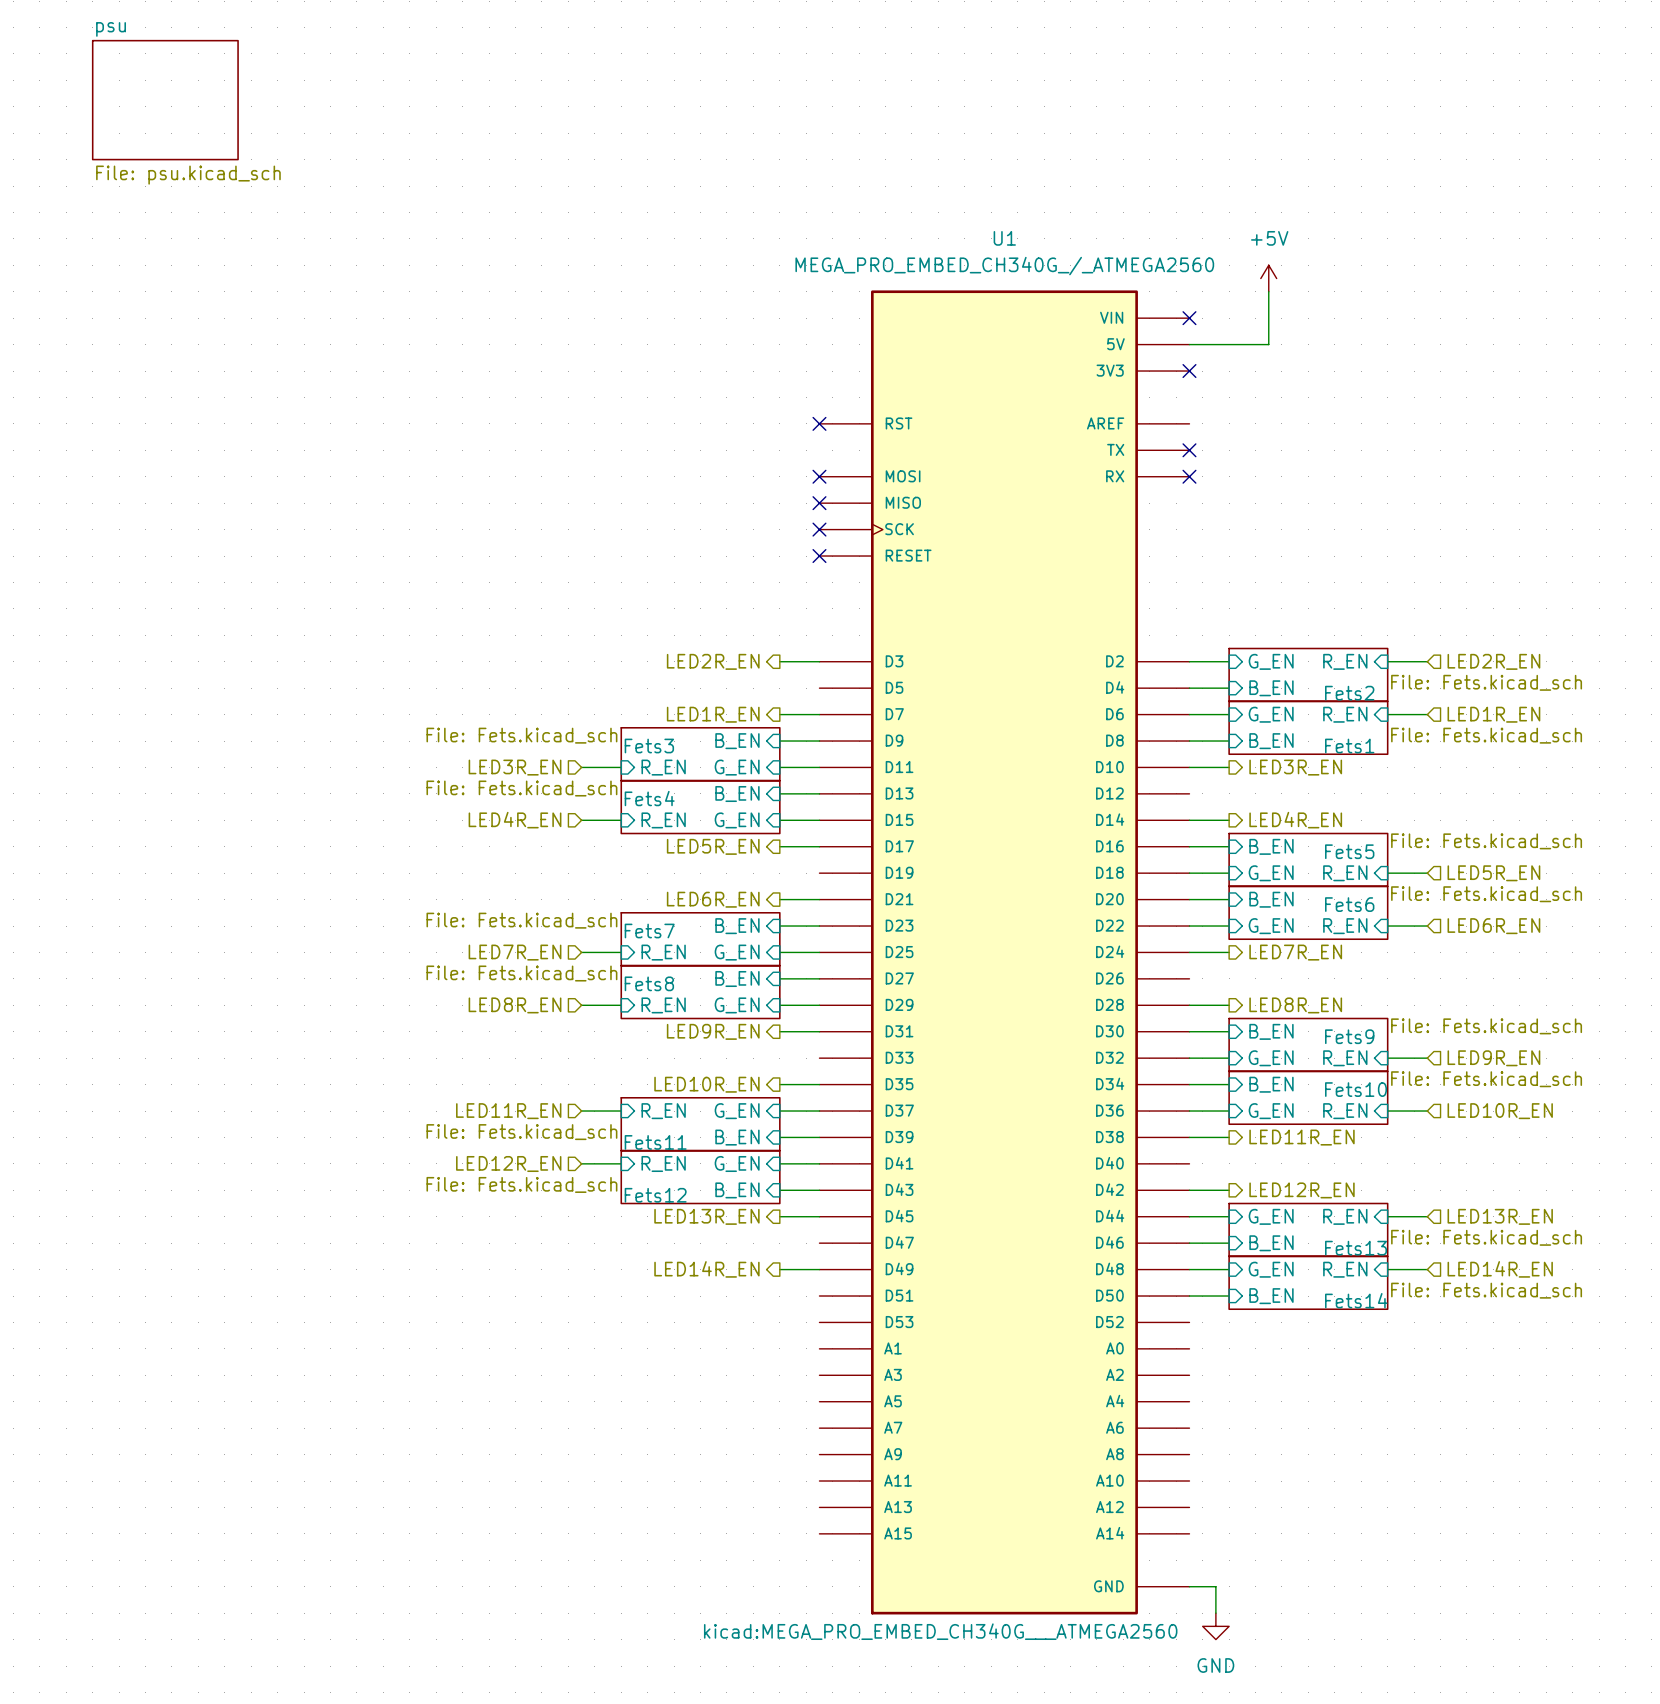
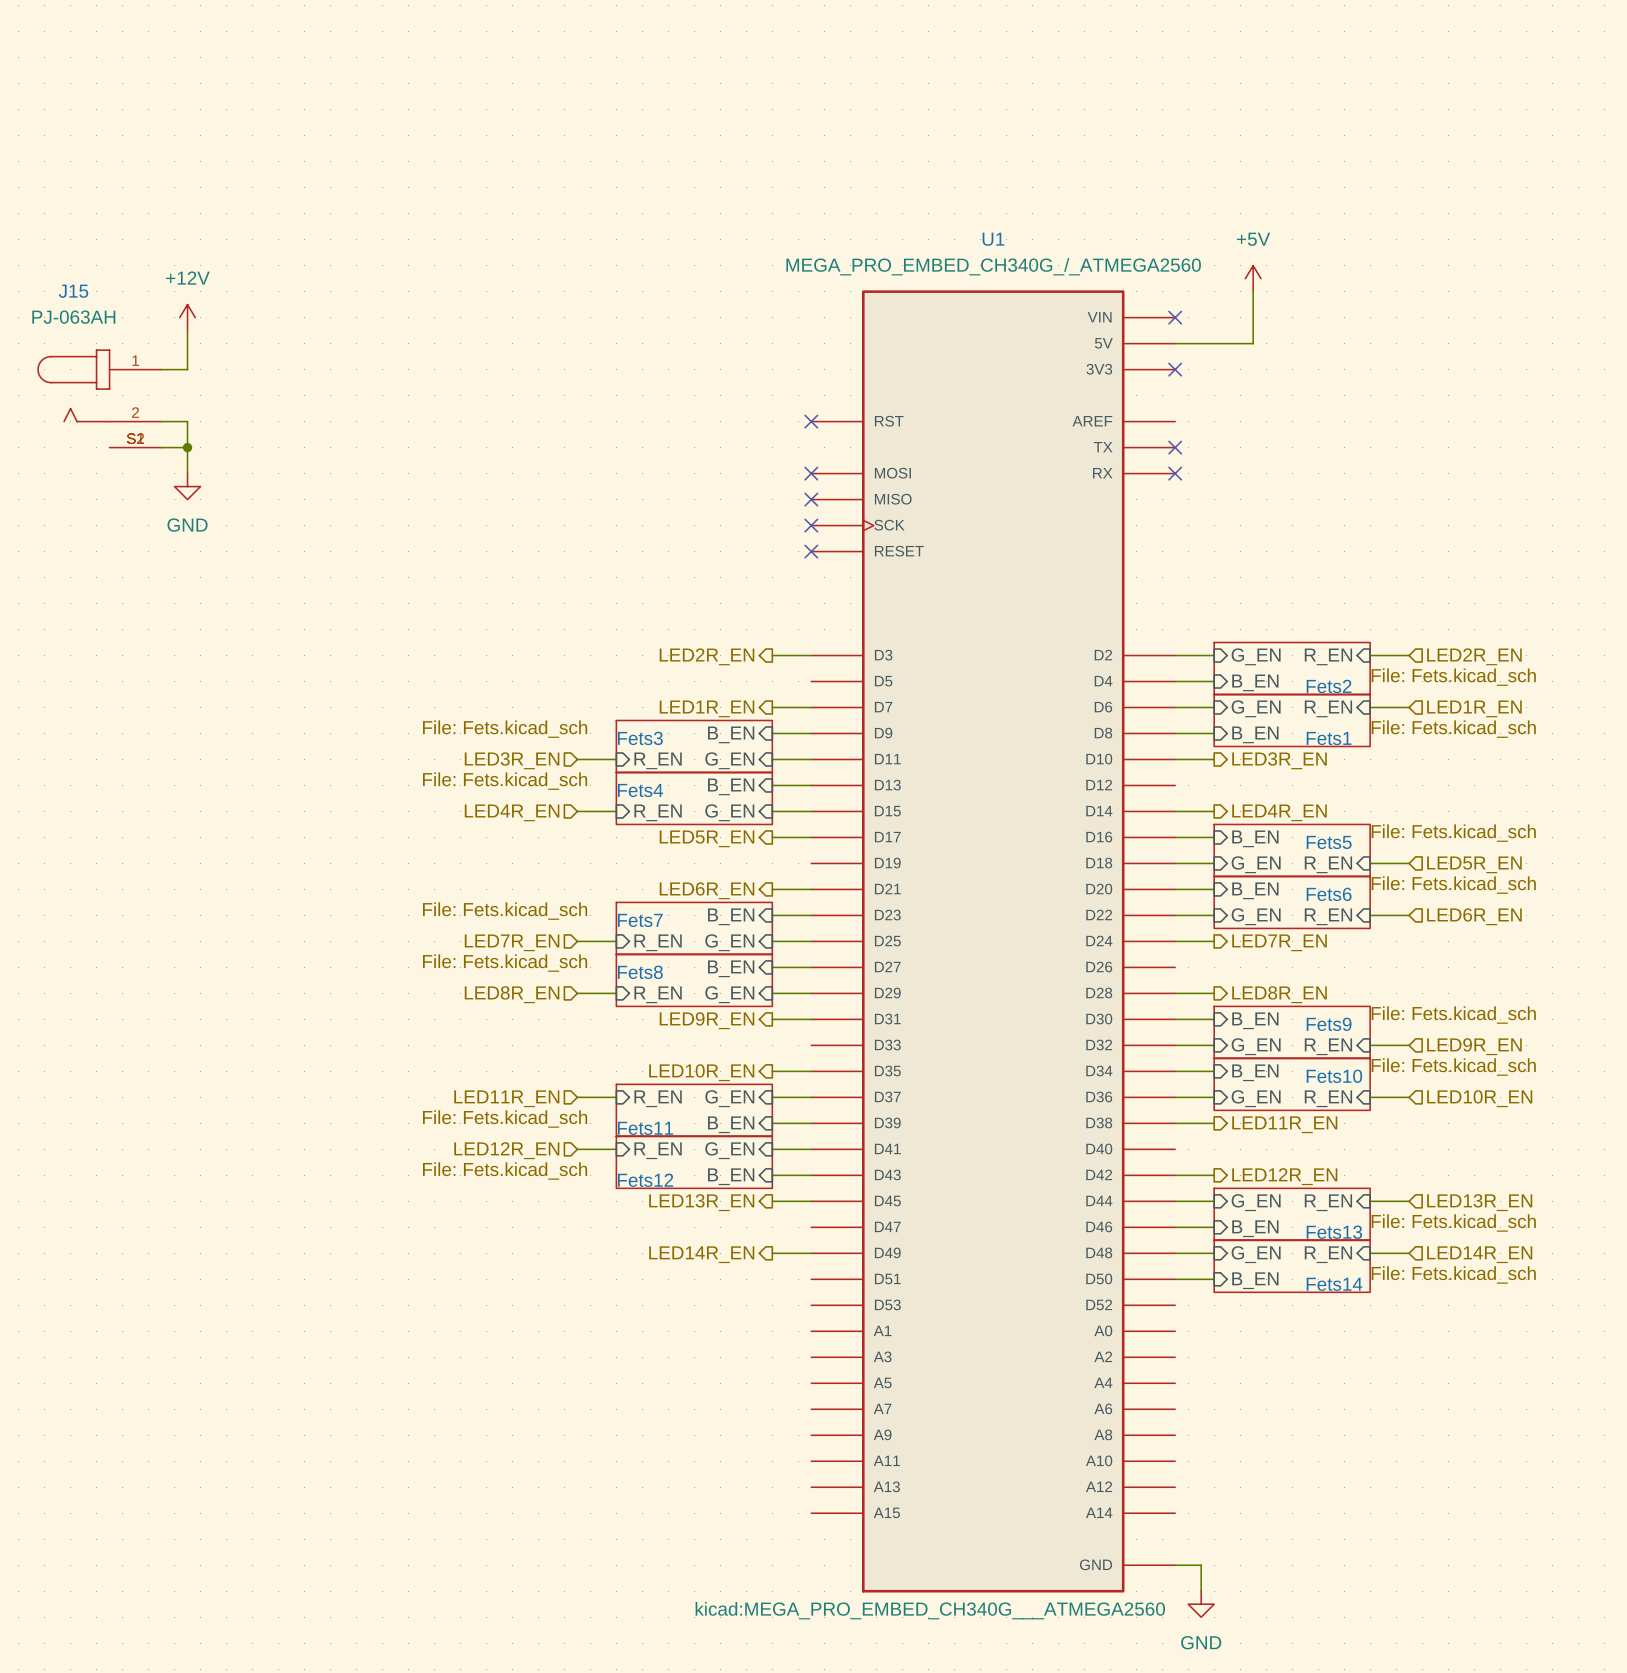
sheet psu: File: psu.kicad_sch (165, 100) -> none
power symbol: none -> +12V (187, 317)
wire: none -> (187, 330) (187, 369) (161, 369)
J15: none -> PJ-063AH (99, 398)
wire: none -> (161, 421) (187, 421) (187, 473)
wire: none -> (161, 447) (187, 447)
junction: none -> (187, 447)
power symbol: none -> GND (187, 486)

